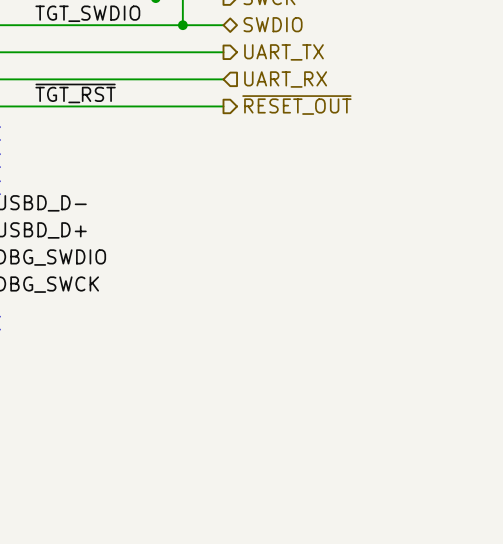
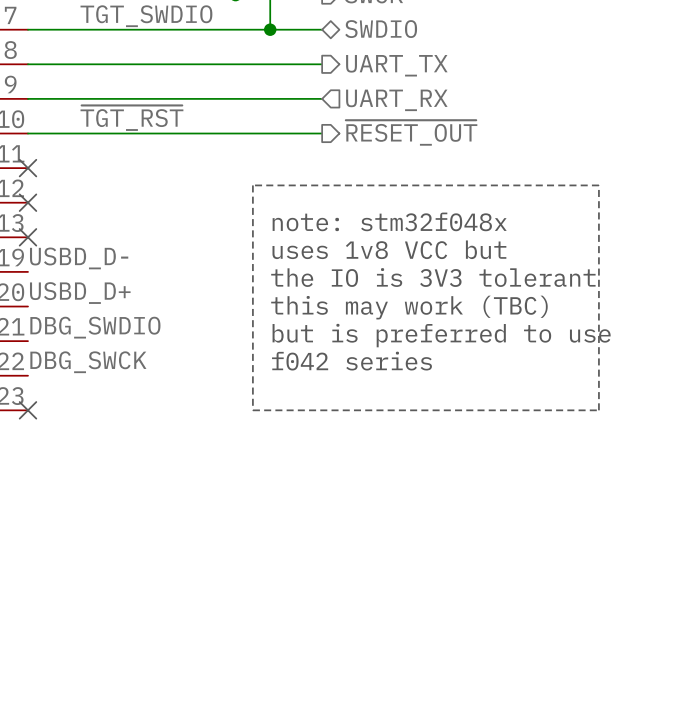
line: none -> (252, 185) (252, 410) (598, 410) (598, 185) (252, 185)
text: none -> note: stm32f048x (389, 221)
text: none -> uses 1v8 VCC but (389, 249)
text: none -> the IO is 3V3 tolerant (433, 277)
text: none -> this may work (TBC) (409, 307)
text: none -> but is preferred to use (441, 335)
text: none -> f042 series (351, 361)

